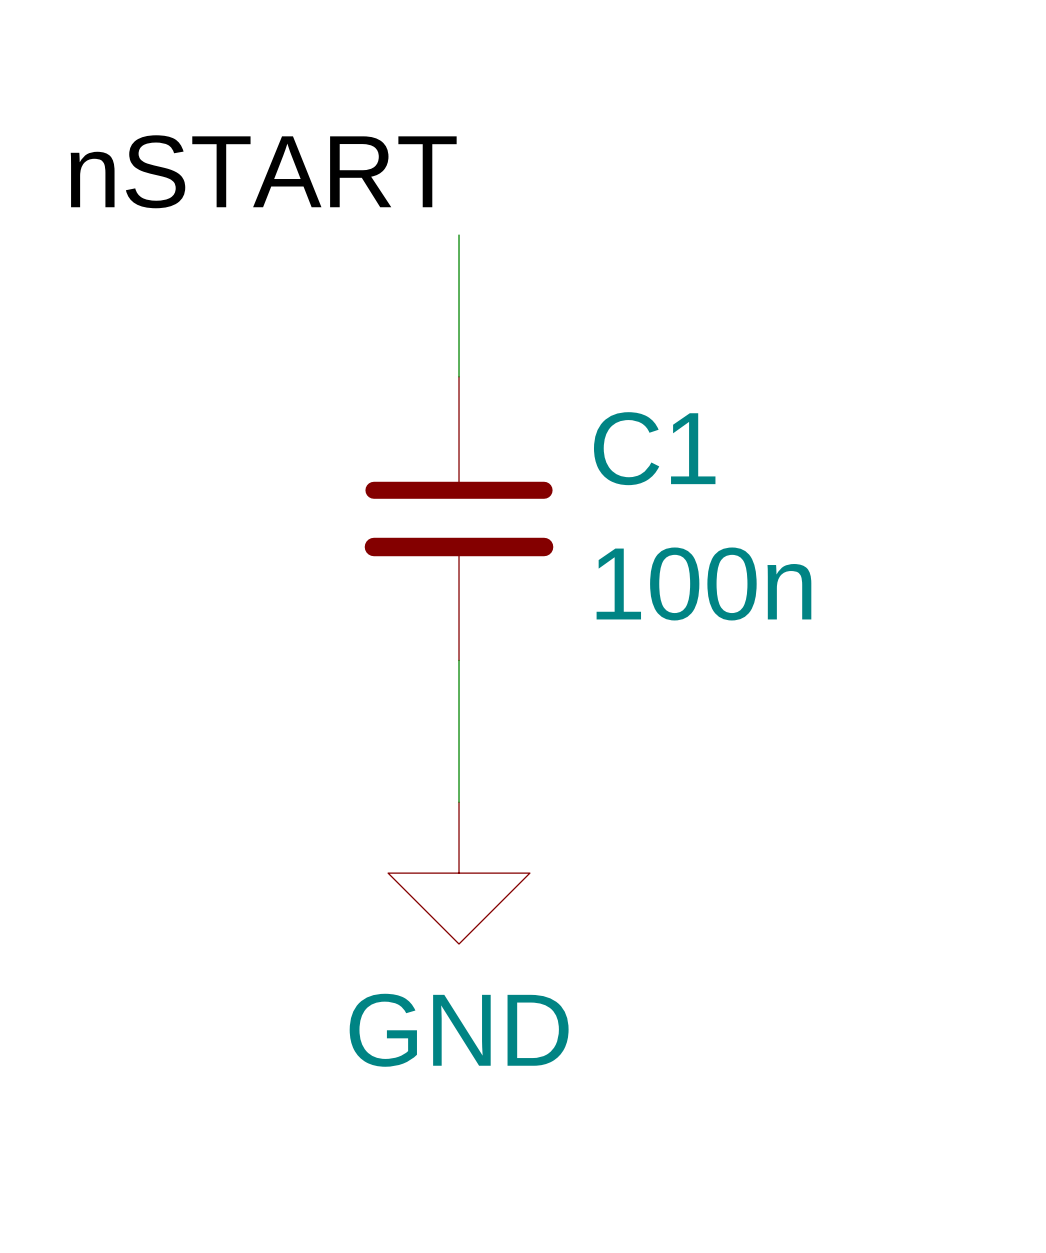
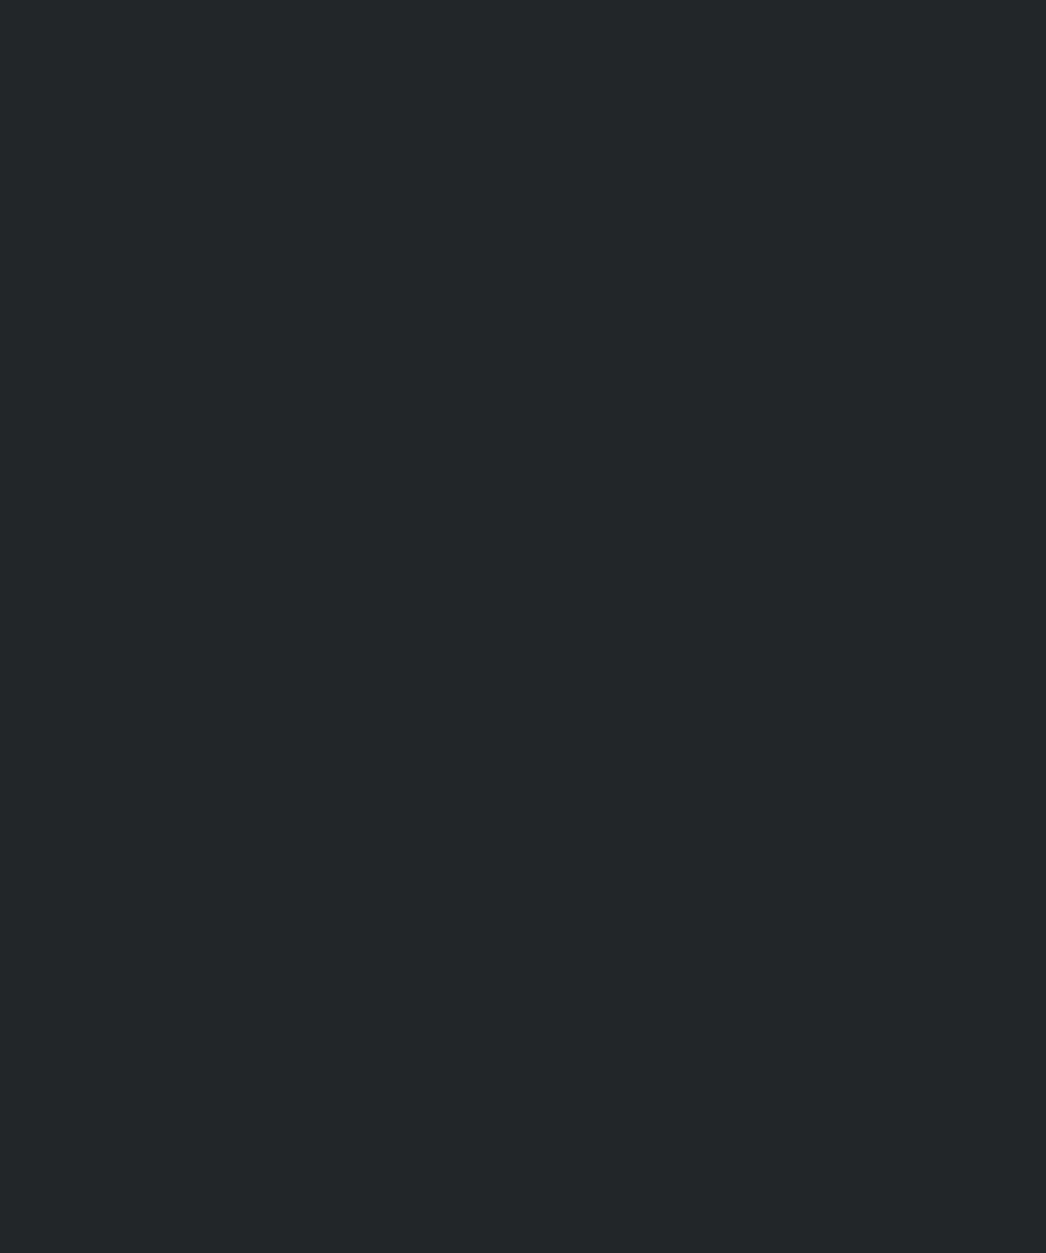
label: nSTART (263, 171) -> none
wire: (459, 235) (459, 376) -> none
C1: 100n (459, 518) -> none
wire: (459, 660) (459, 802) -> none
power symbol: GND (459, 873) -> none

